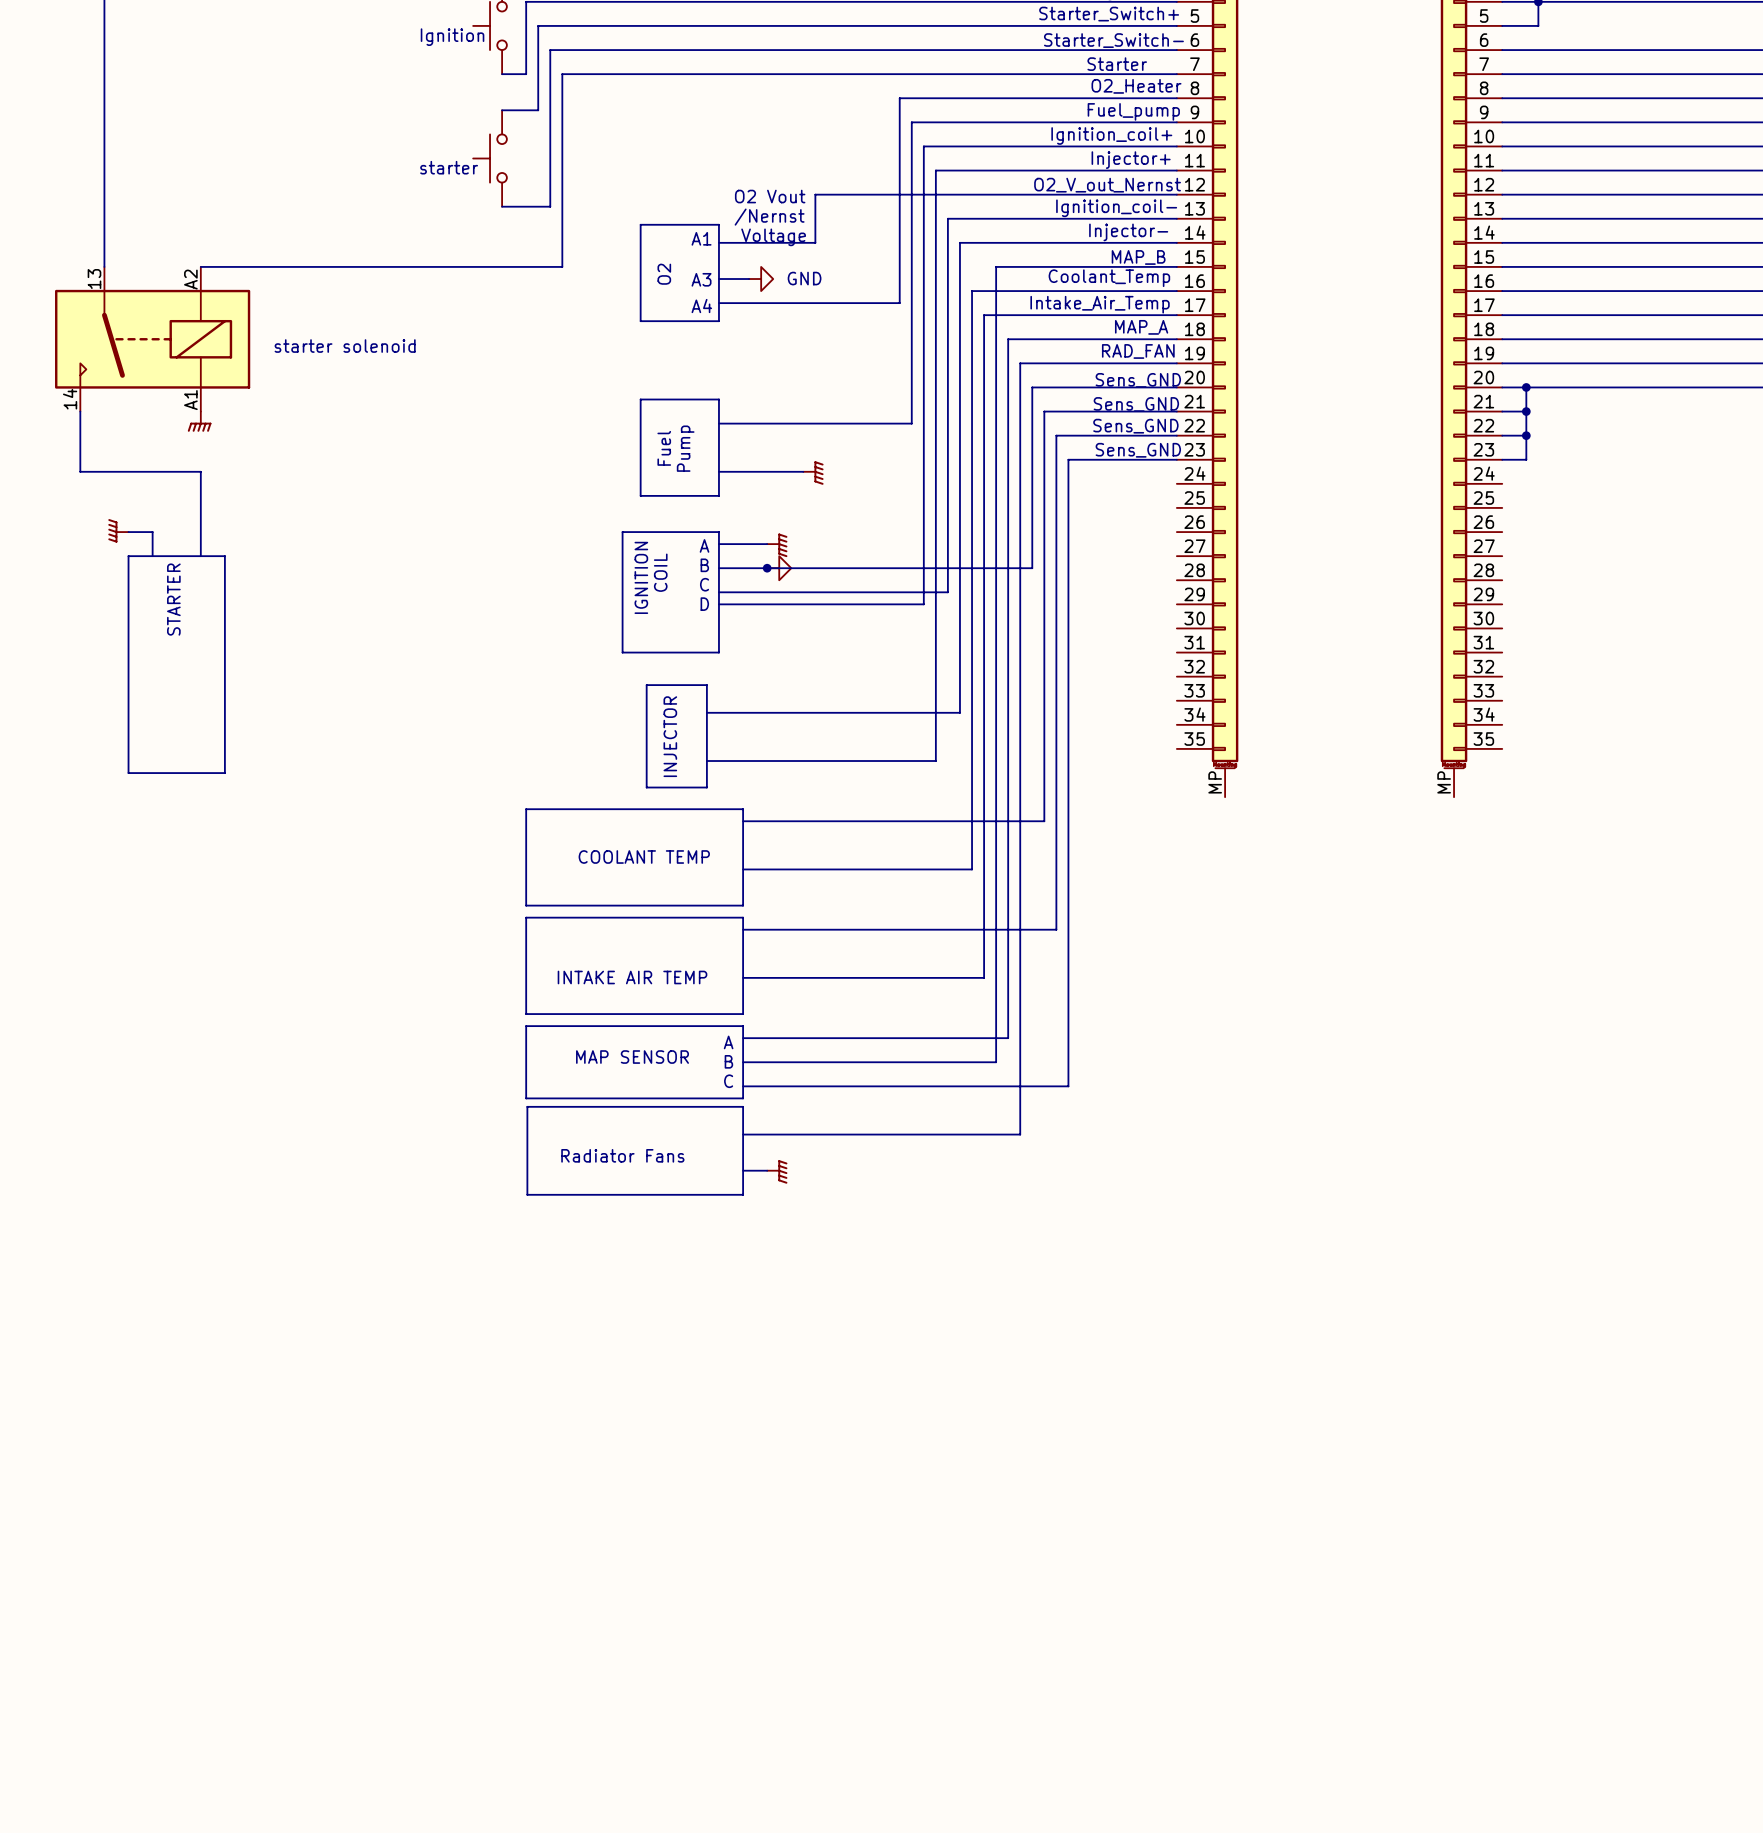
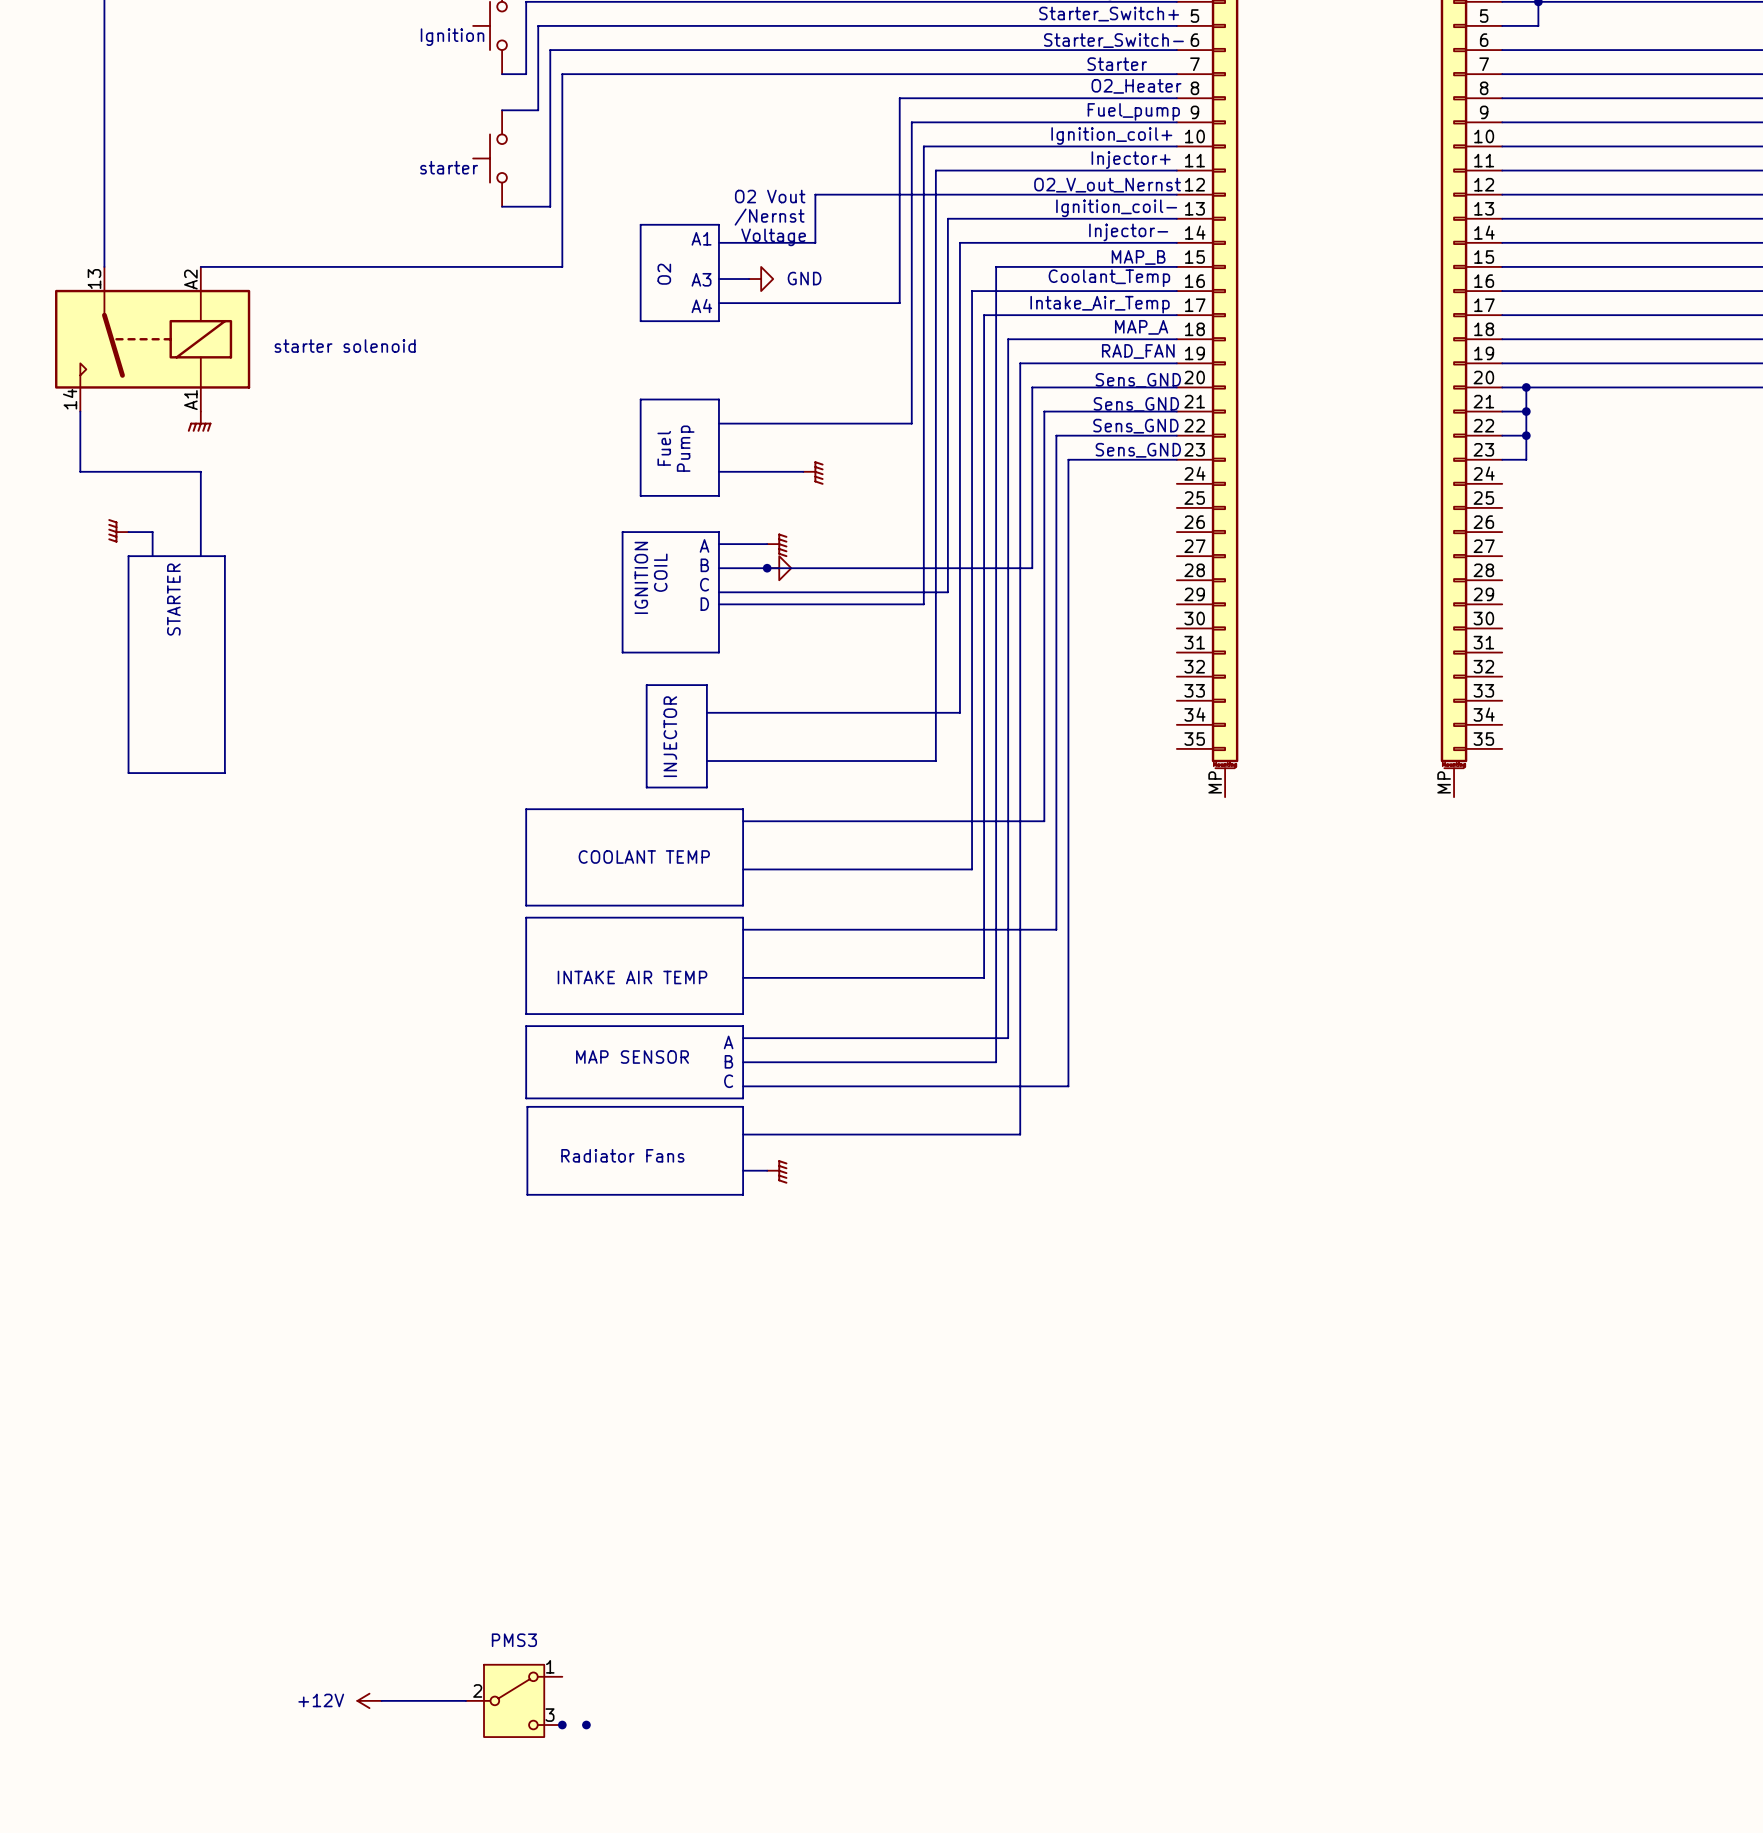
power symbol: none -> +12V (369, 1700)
wire: none -> (381, 1700) (465, 1700)
PMS3: none -> (514, 1700)
junction: none -> (562, 1725)
junction: none -> (586, 1725)

